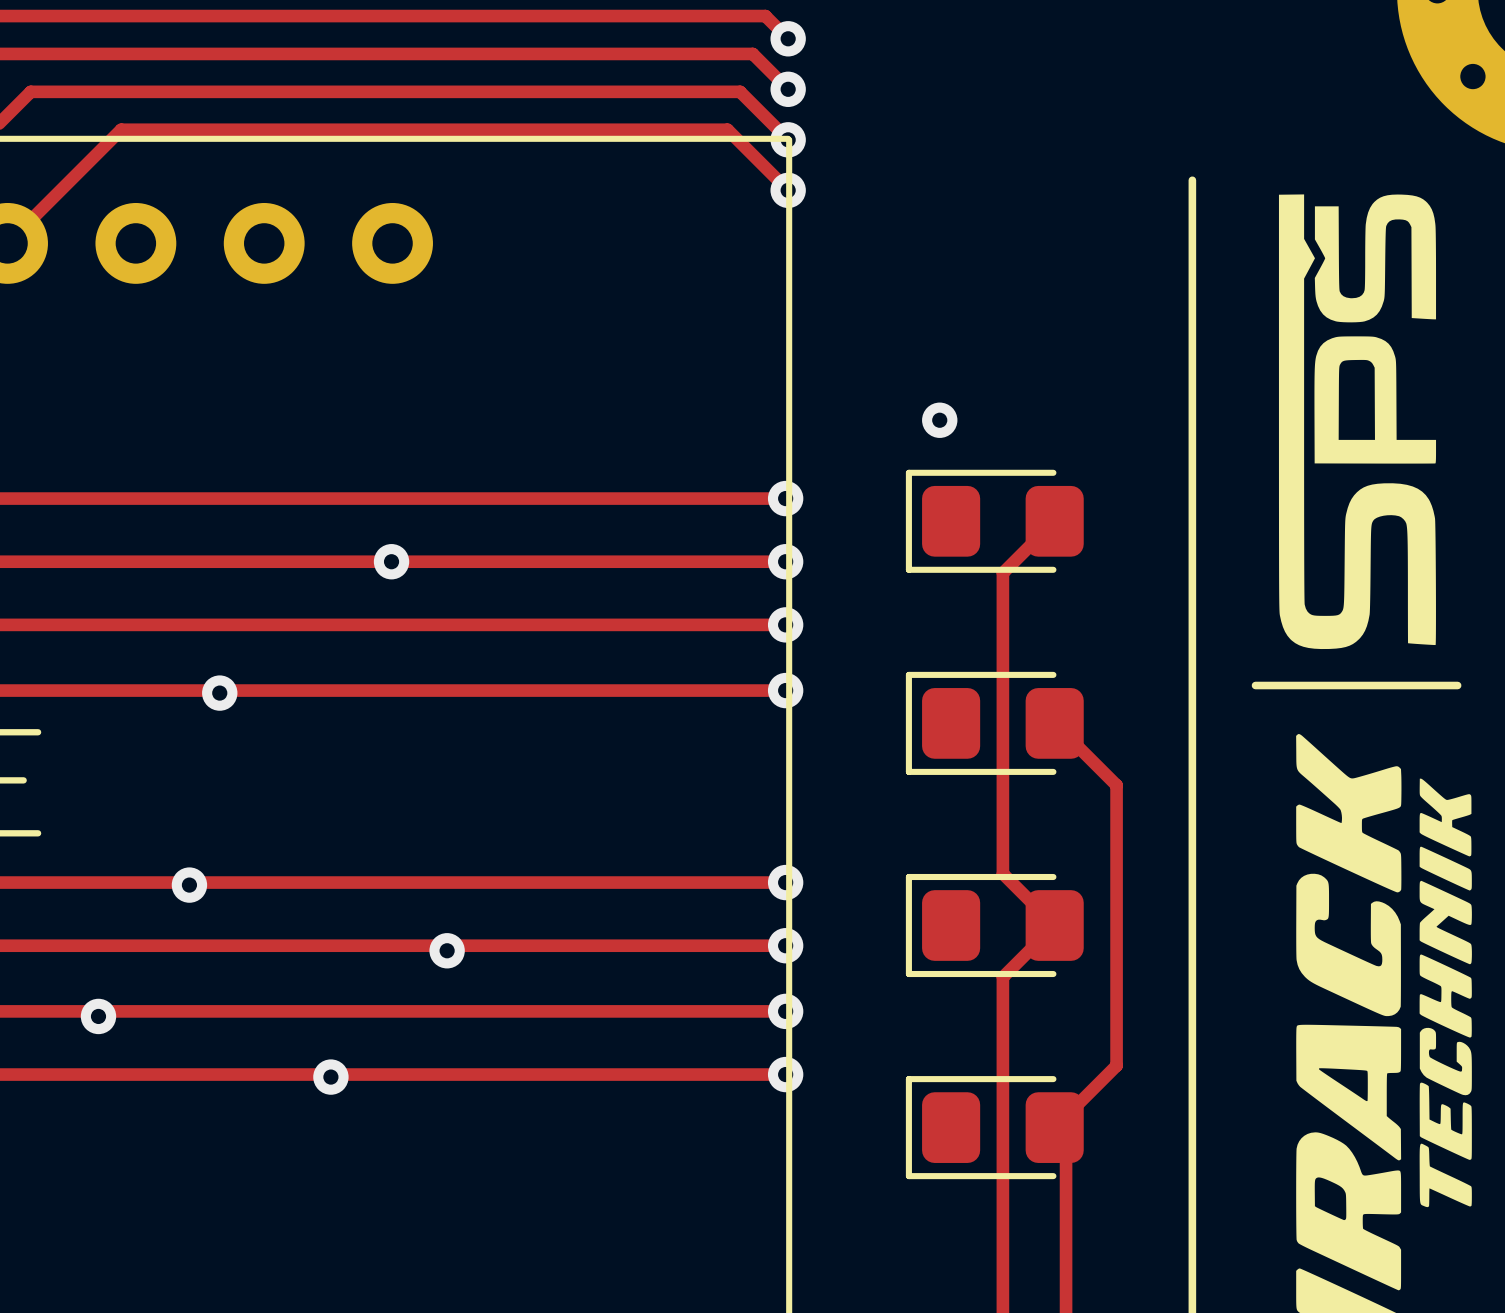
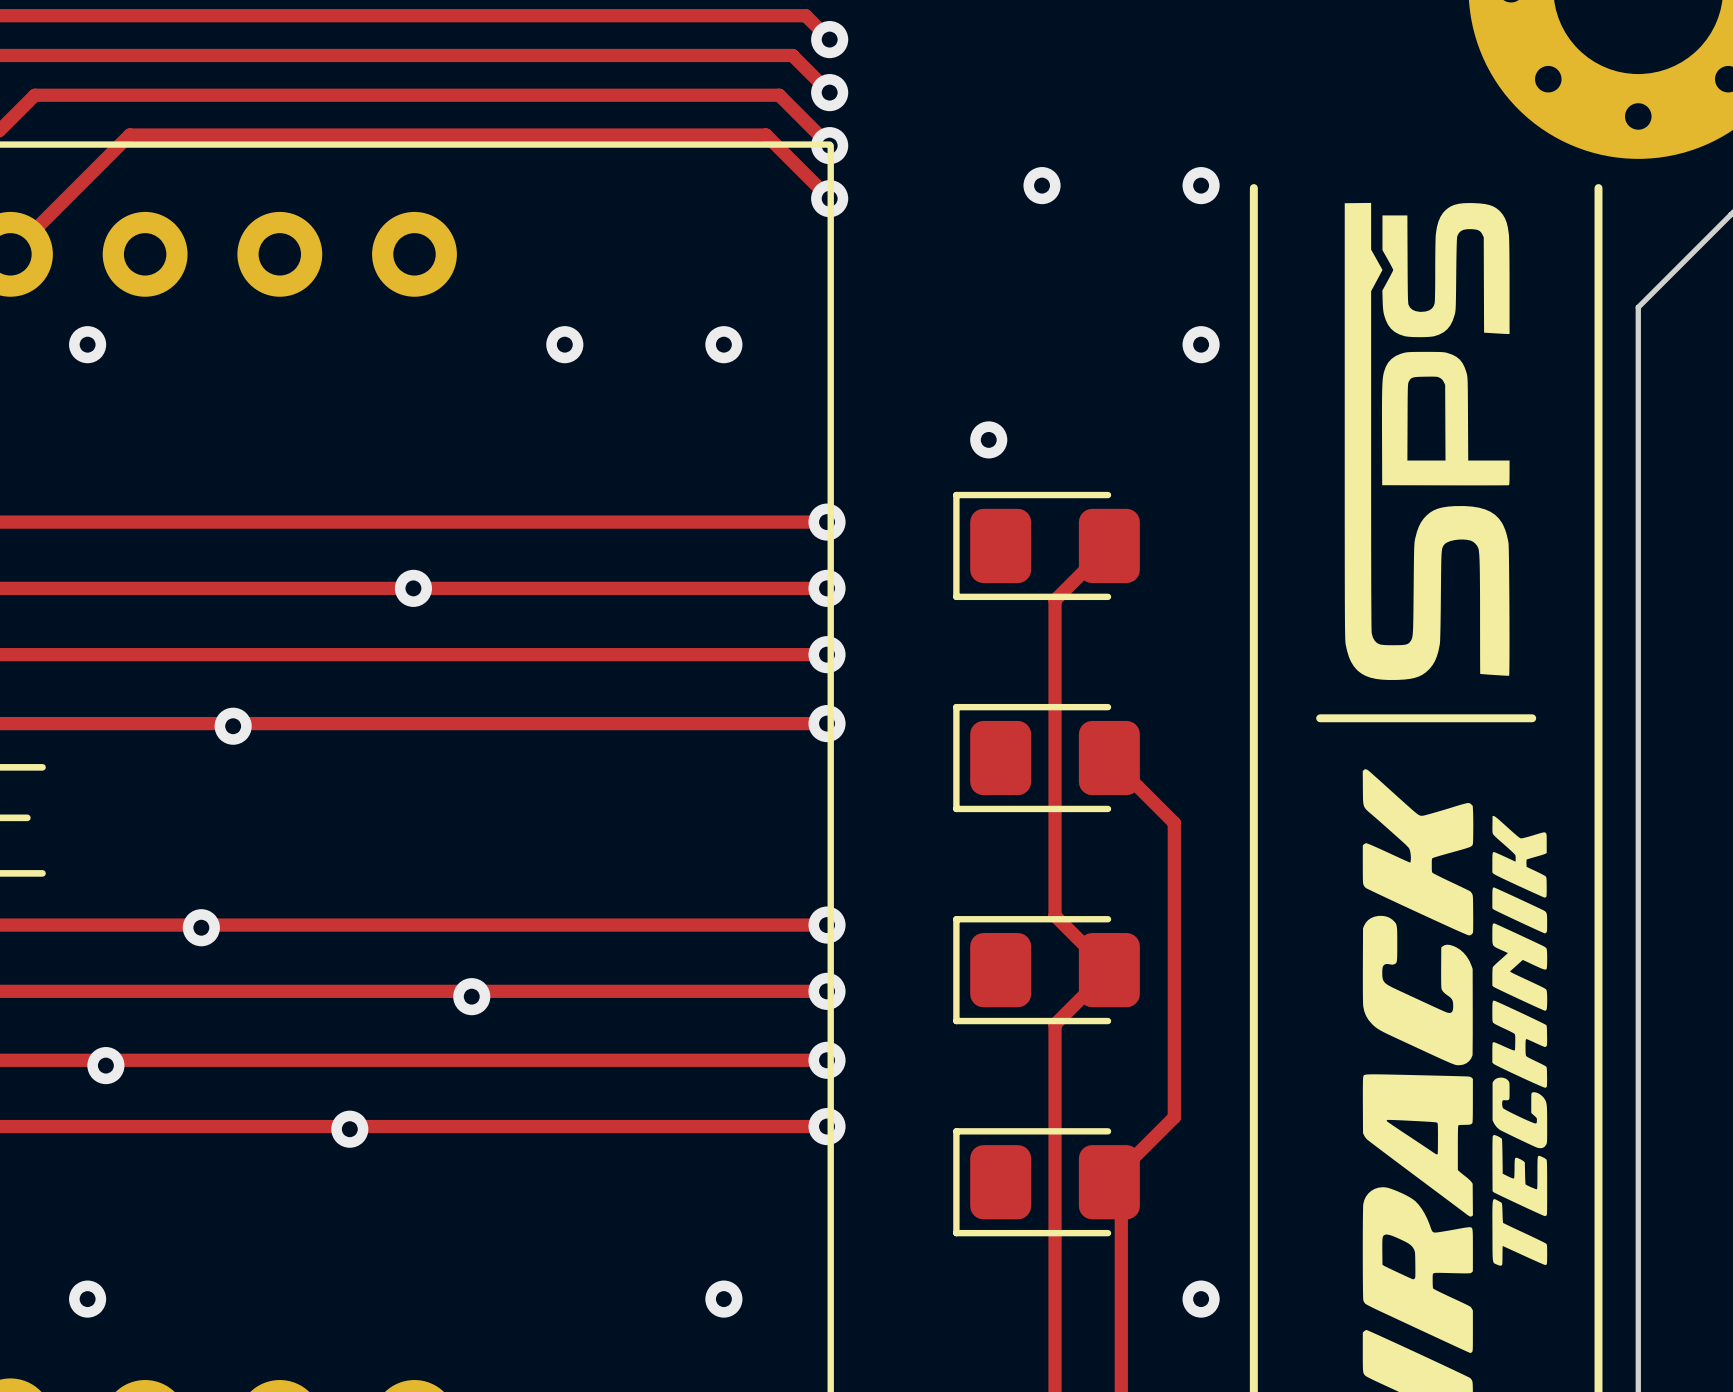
via: none -> (1042, 185)
via: none -> (1201, 185)
via: none -> (87, 344)
via: none -> (564, 344)
via: none -> (723, 344)
via: none -> (1201, 344)
via: none -> (87, 1299)
via: none -> (723, 1299)
via: none -> (1201, 1299)

